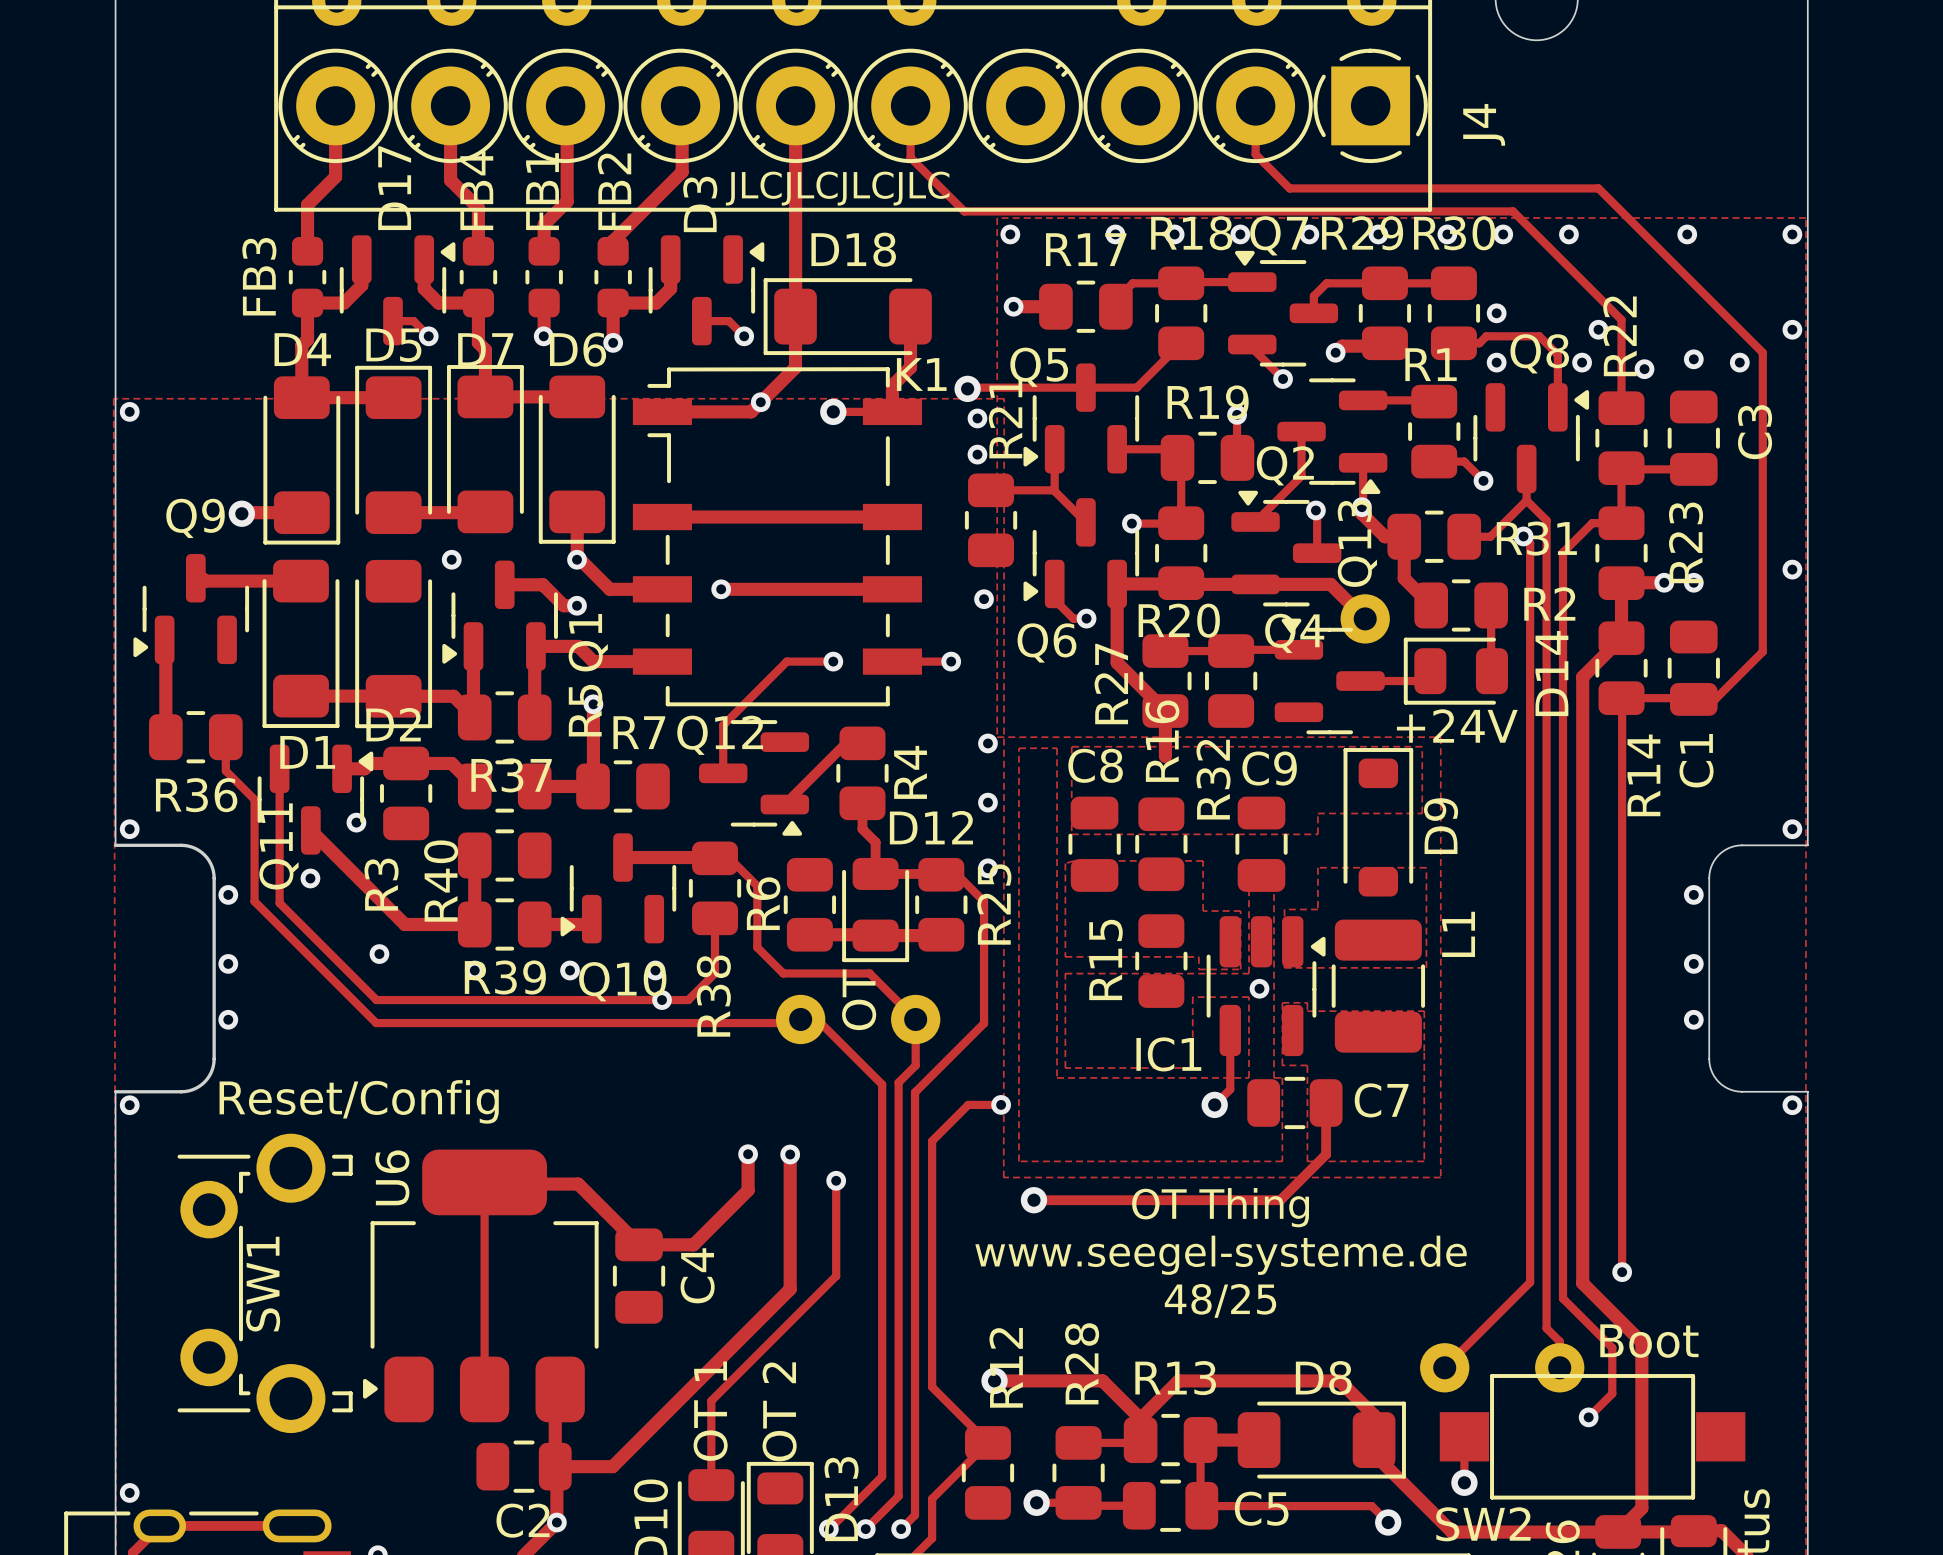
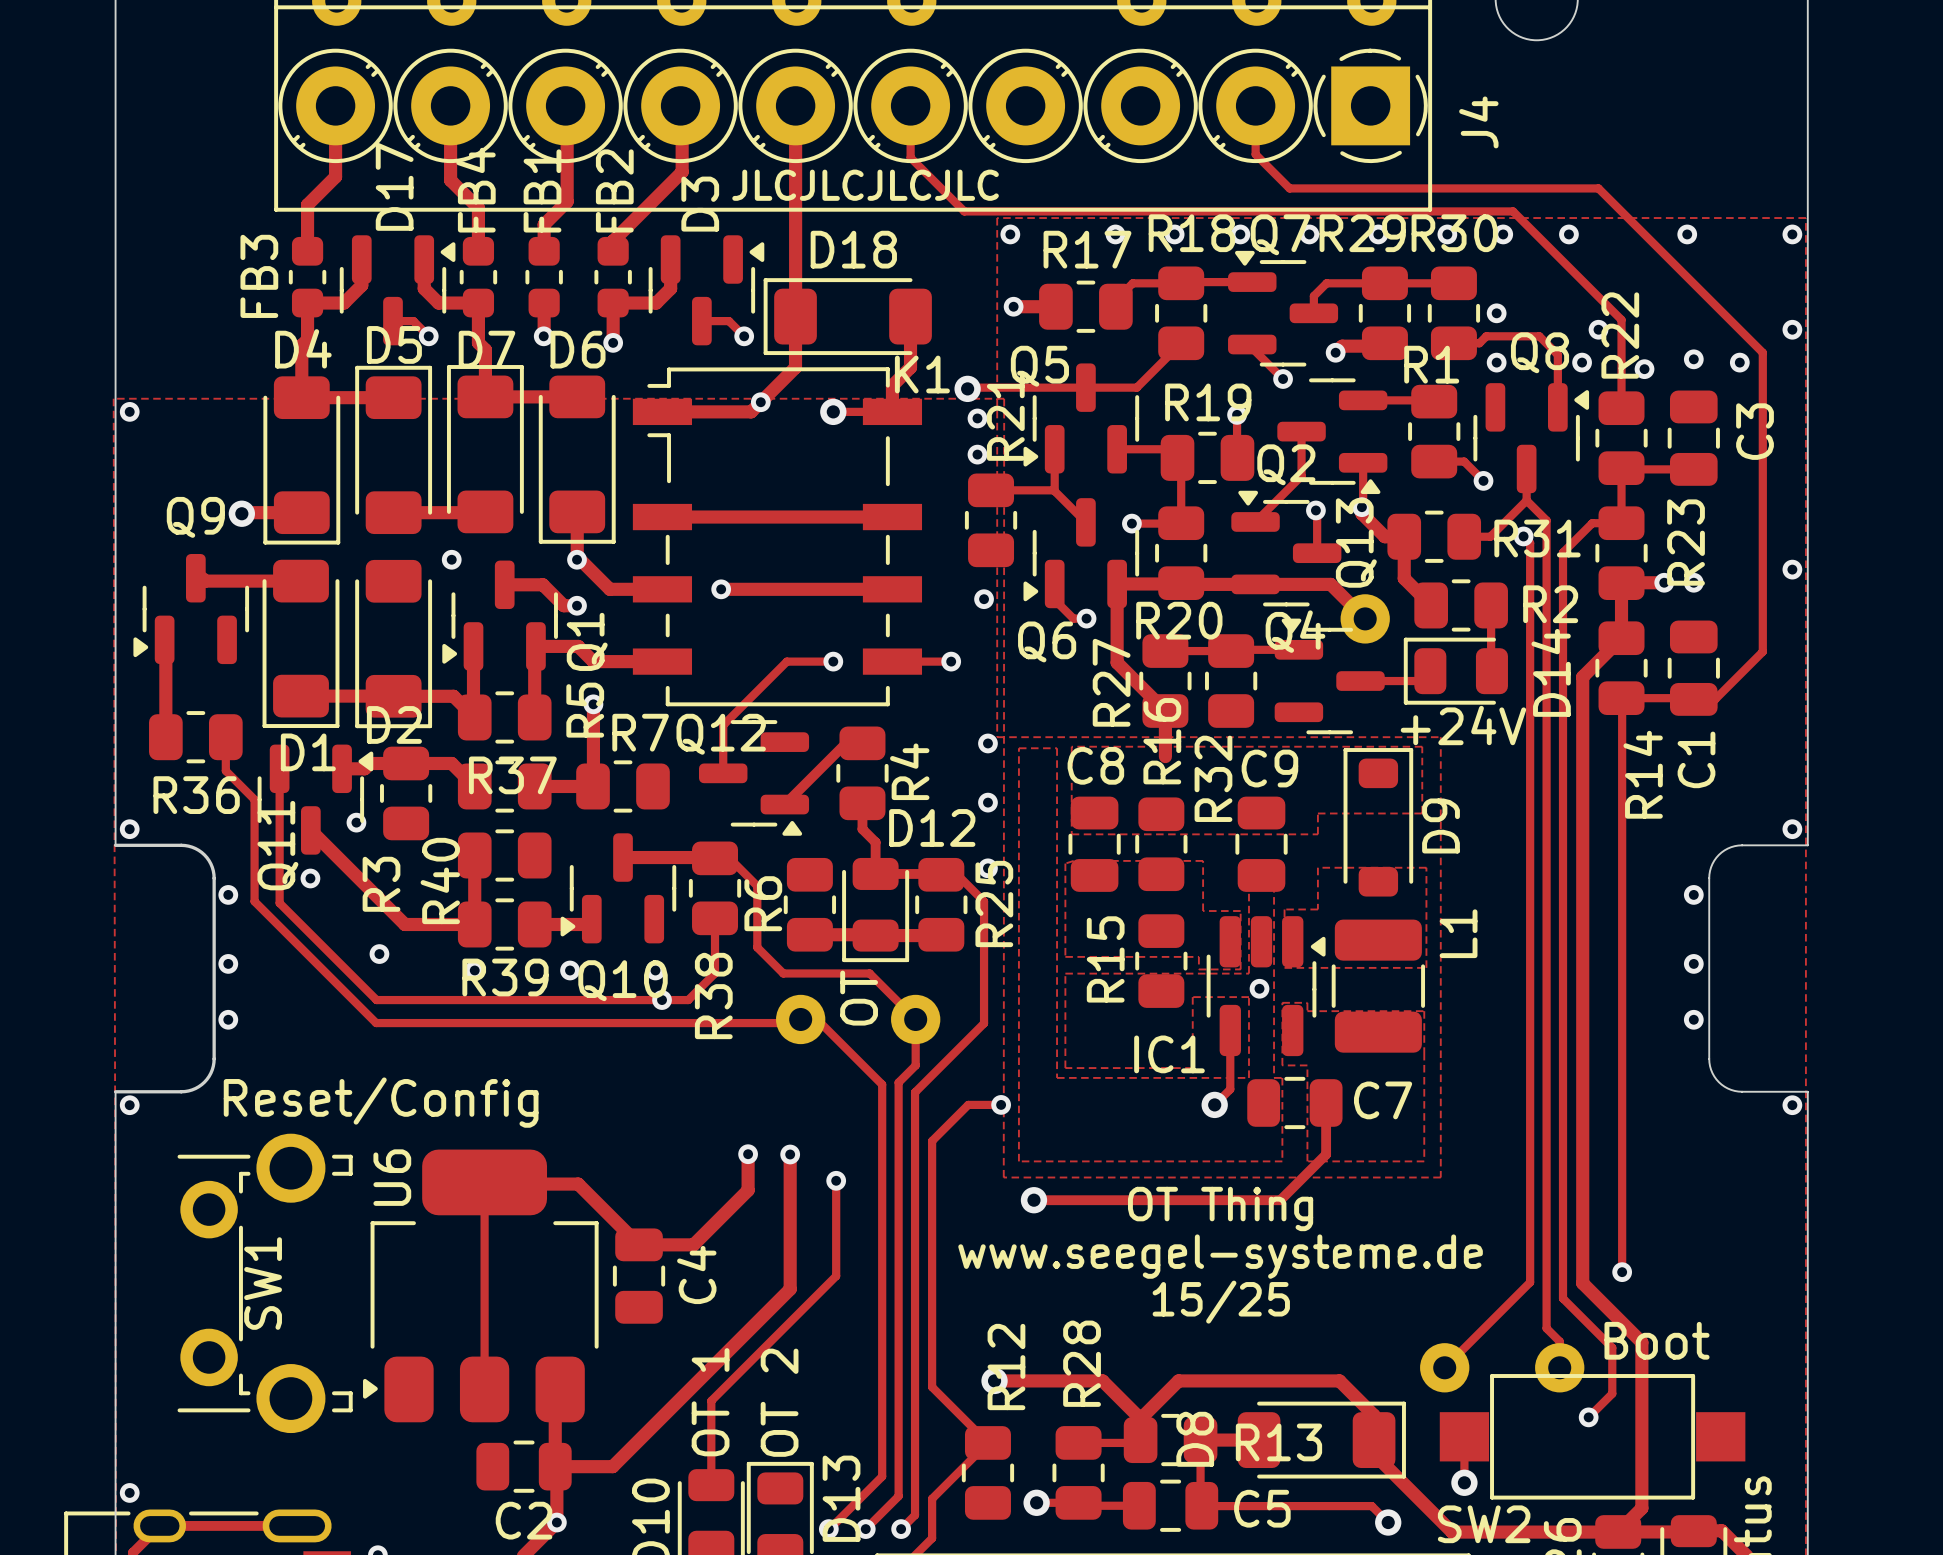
text: 48/25 (1220, 1300) -> 15/25 (1221, 1302)
R13 name position: R13 (1175, 1378) -> R13 (1278, 1442)
D8 name rotation: 0° (1323, 1378) -> 90° counterclockwise (1195, 1439)
D8 name position: D8 (1323, 1378) -> D8 (1195, 1439)

